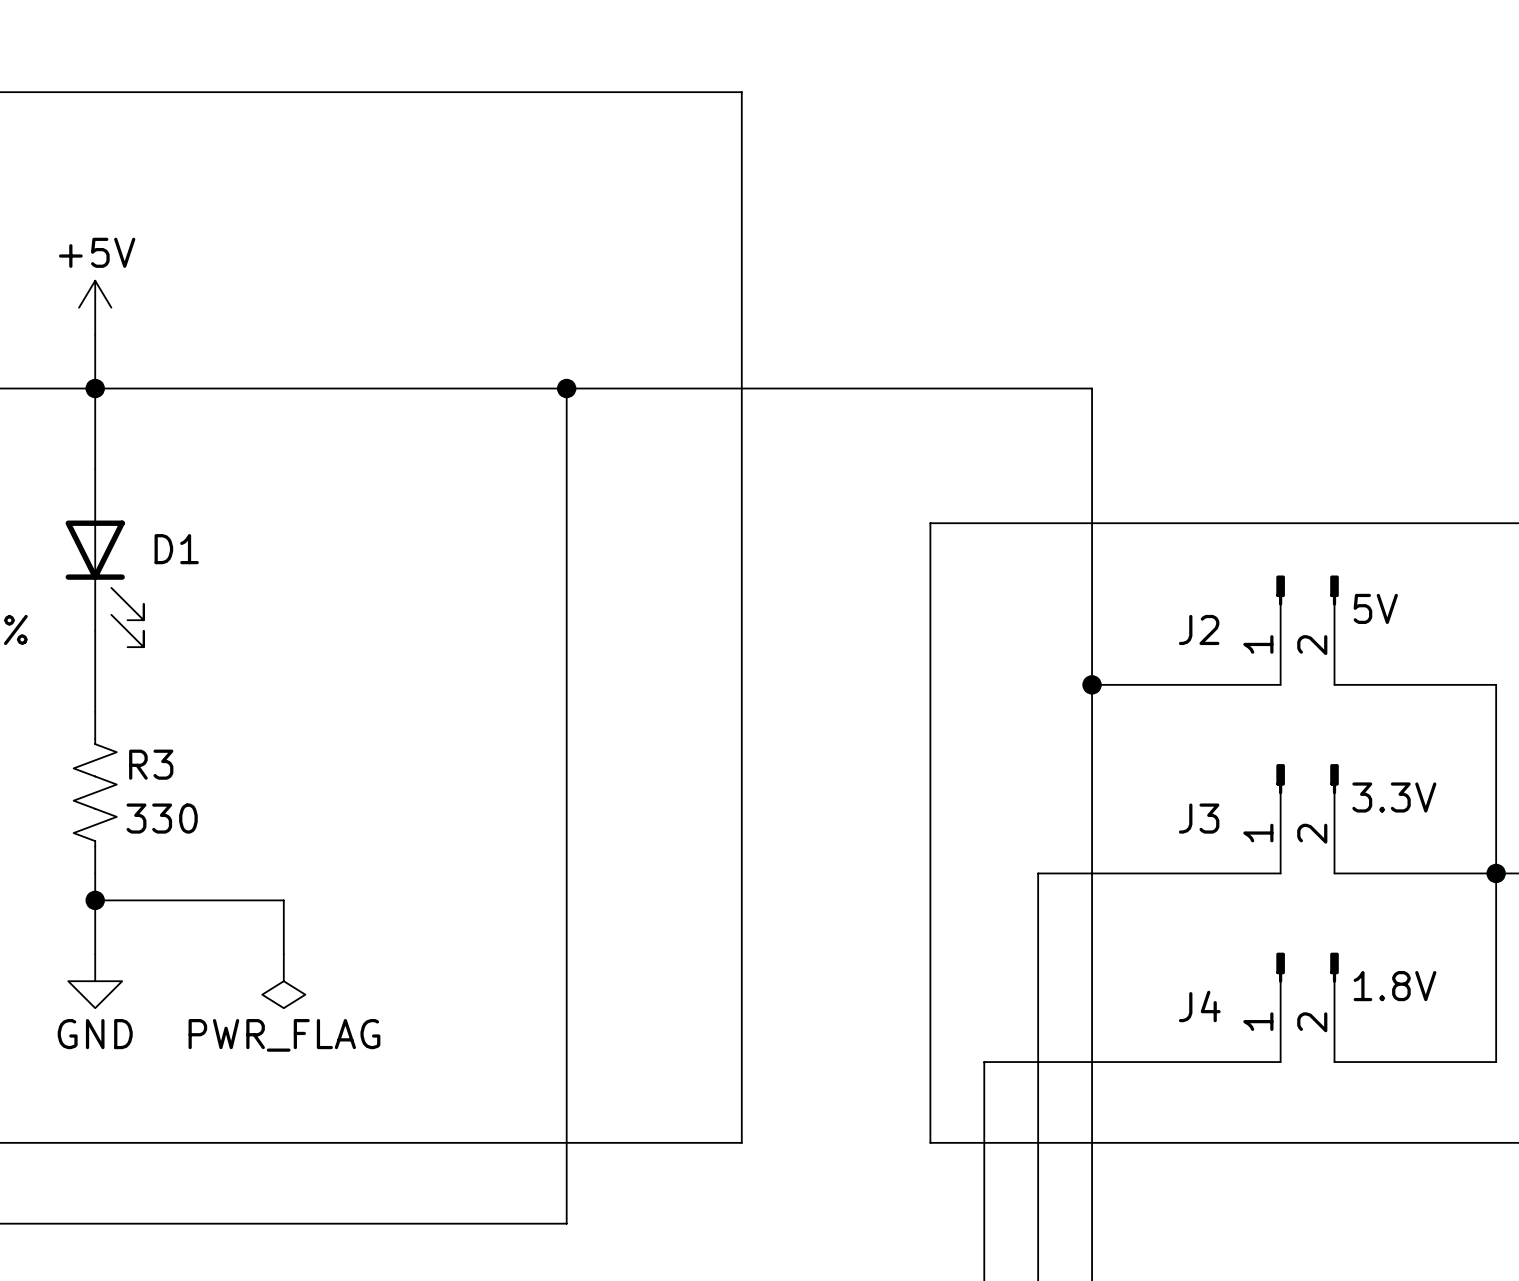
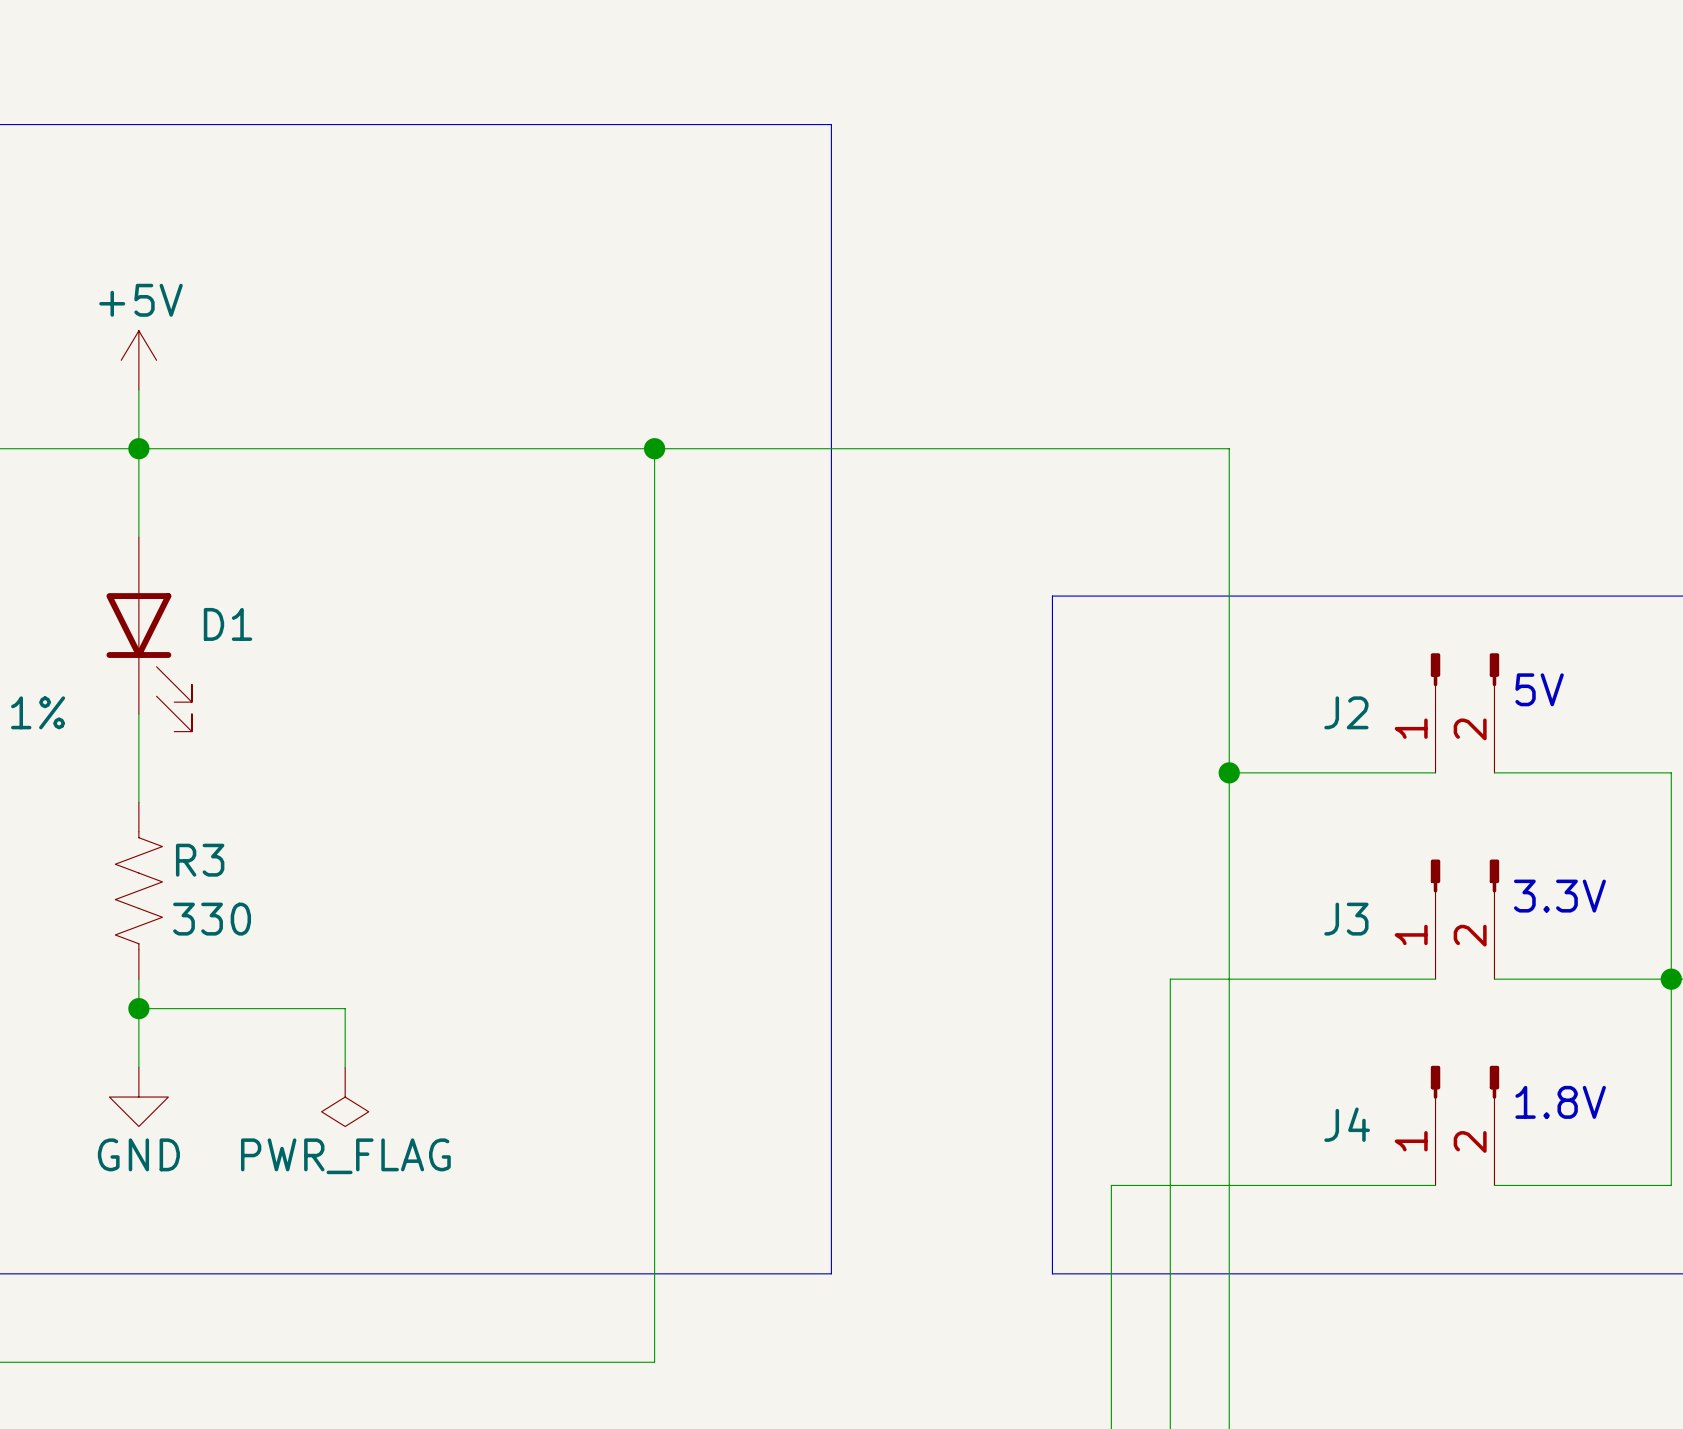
line: (728, 92) (741, 92) (741, 1142) (728, 1142) -> (831, 124) (831, 1273)

